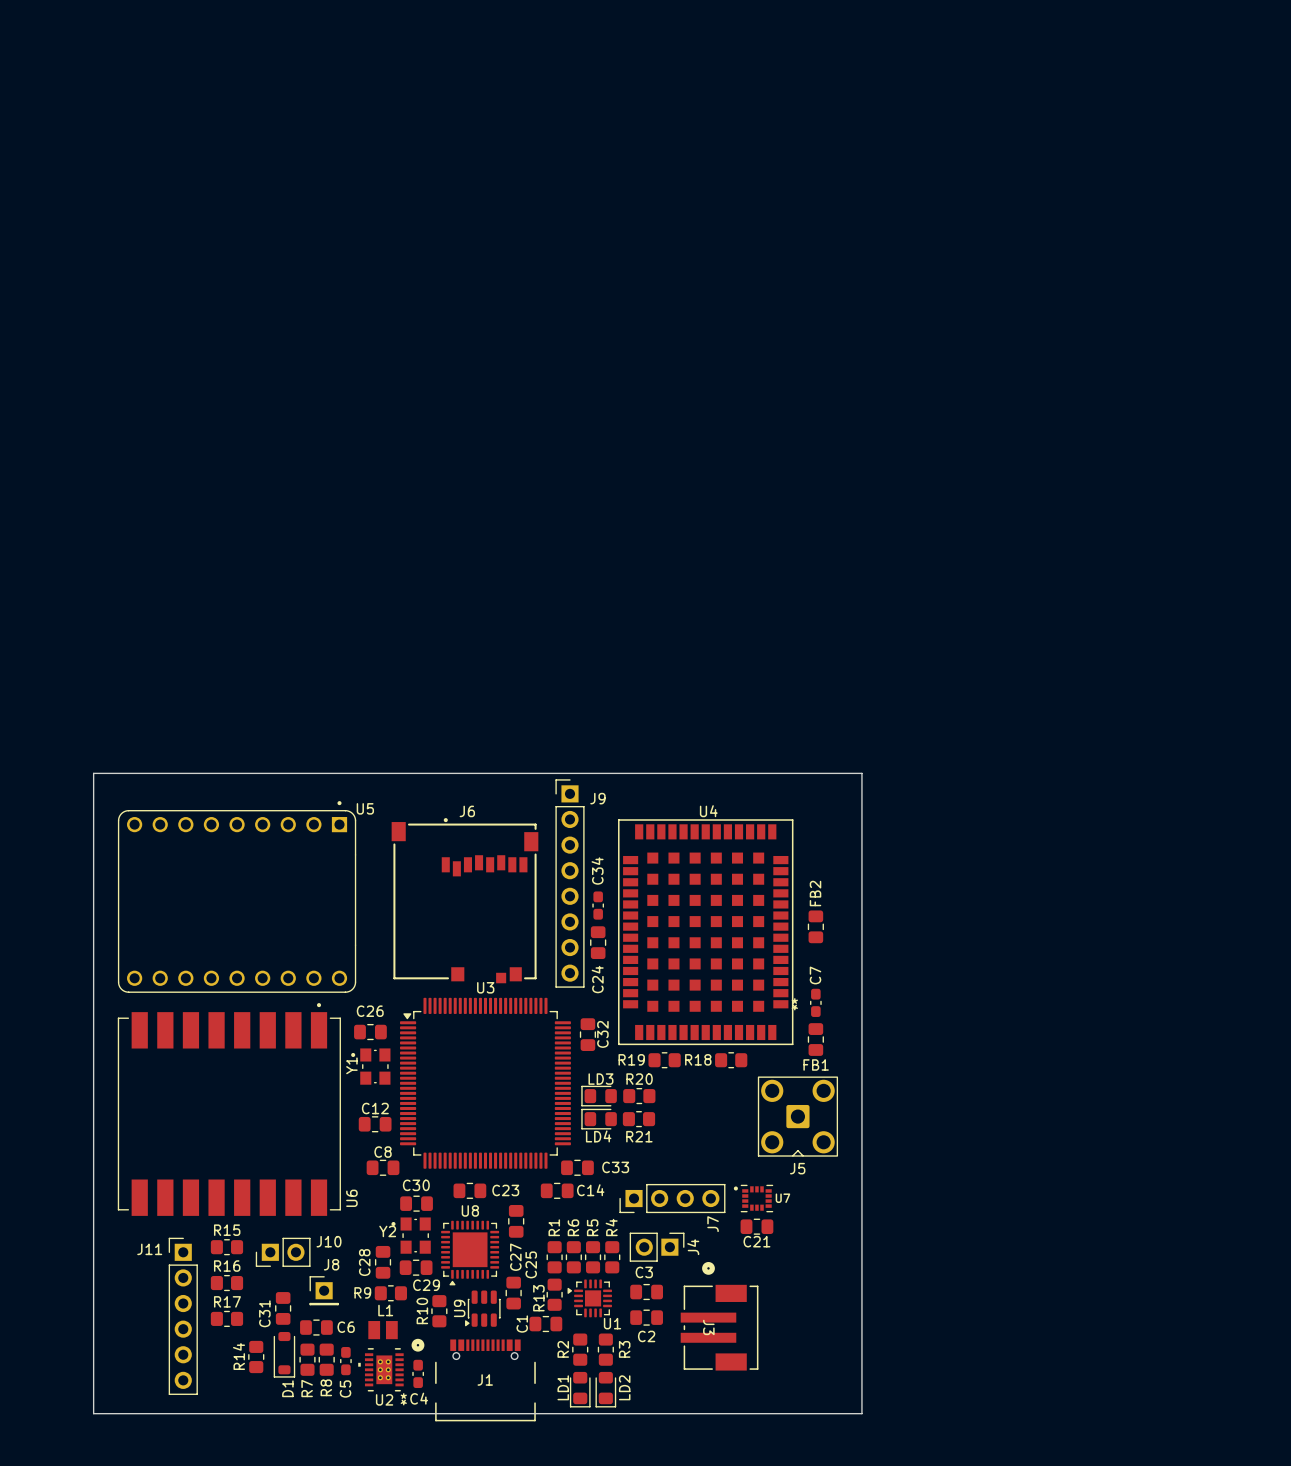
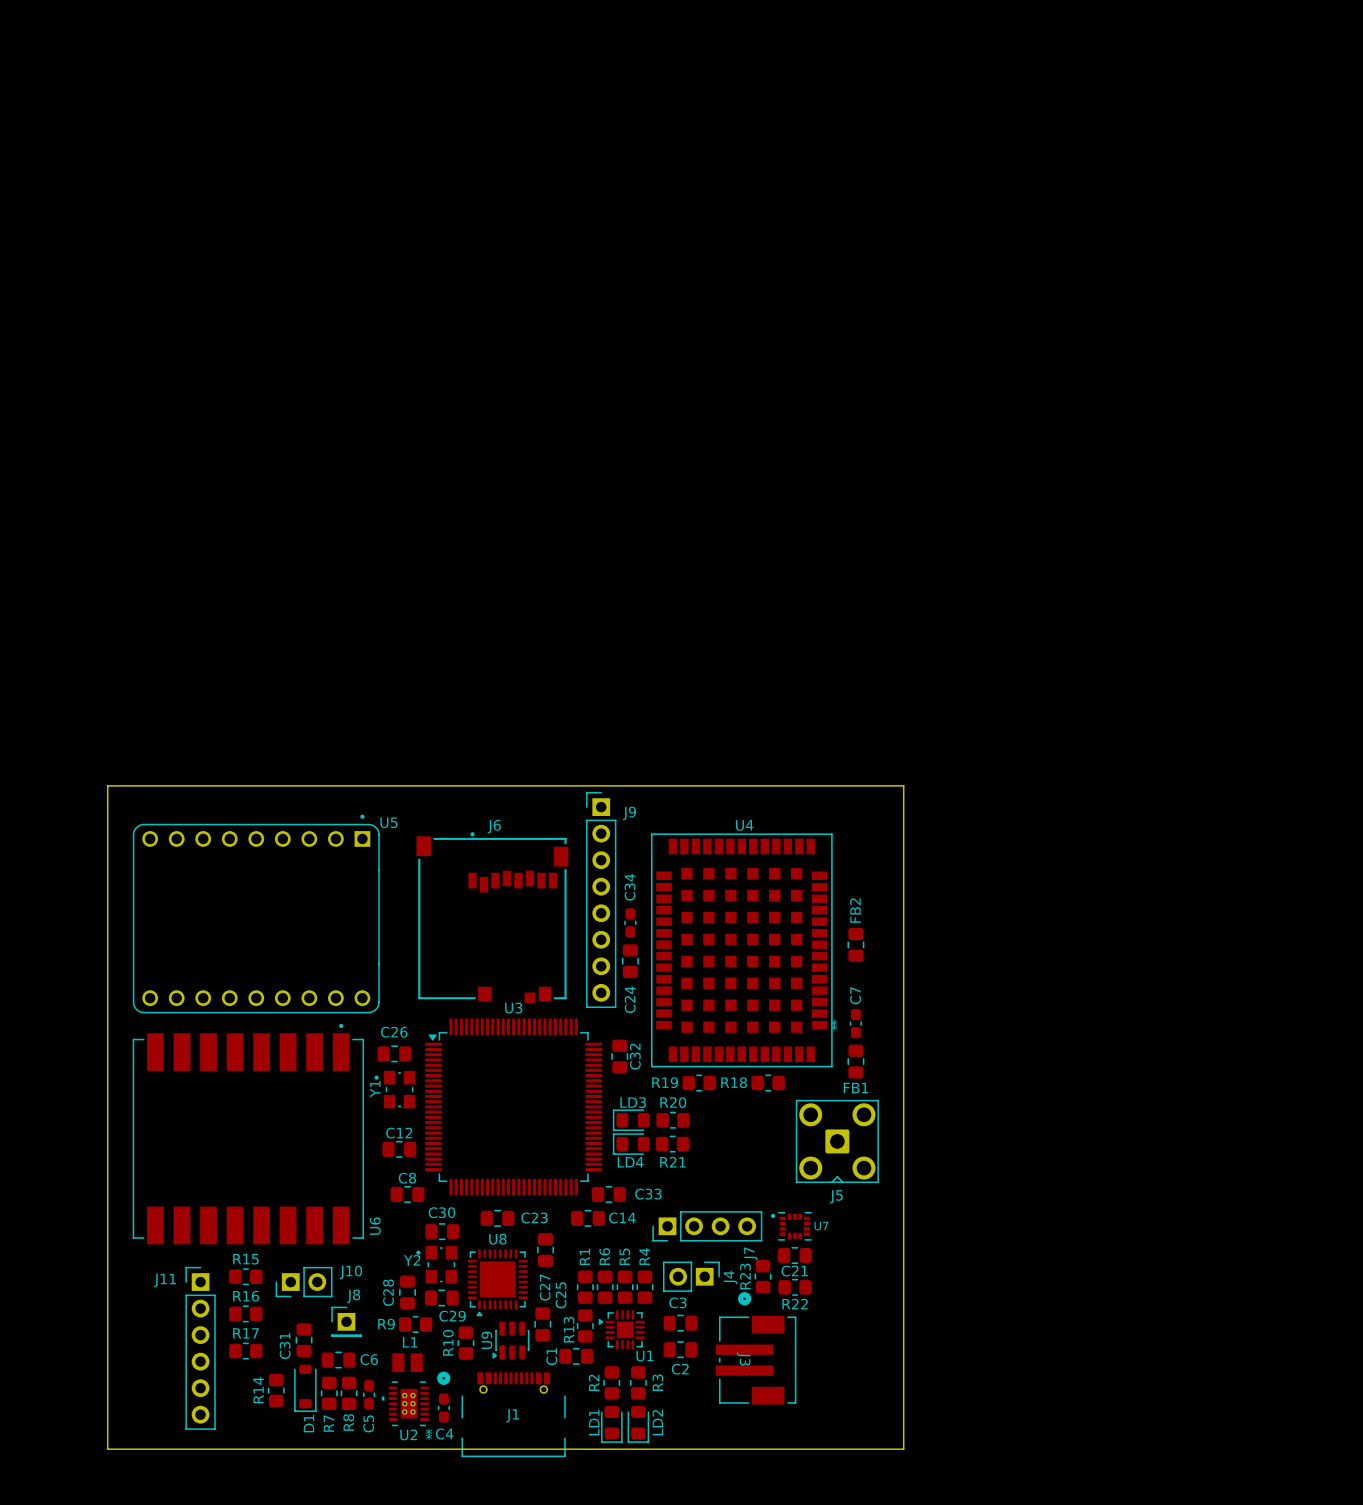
R23: none -> (763, 1276)
R22: none -> (795, 1287)

